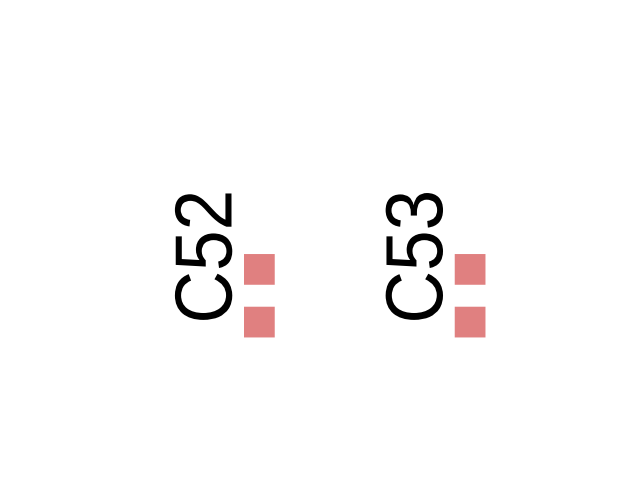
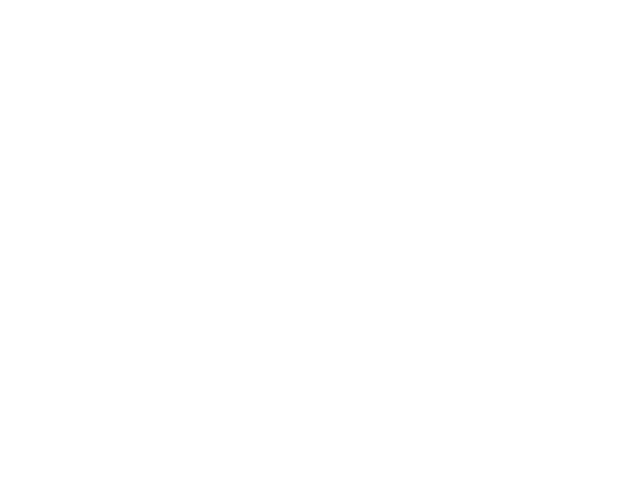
C52: (259, 295) -> none
C53: (470, 295) -> none

